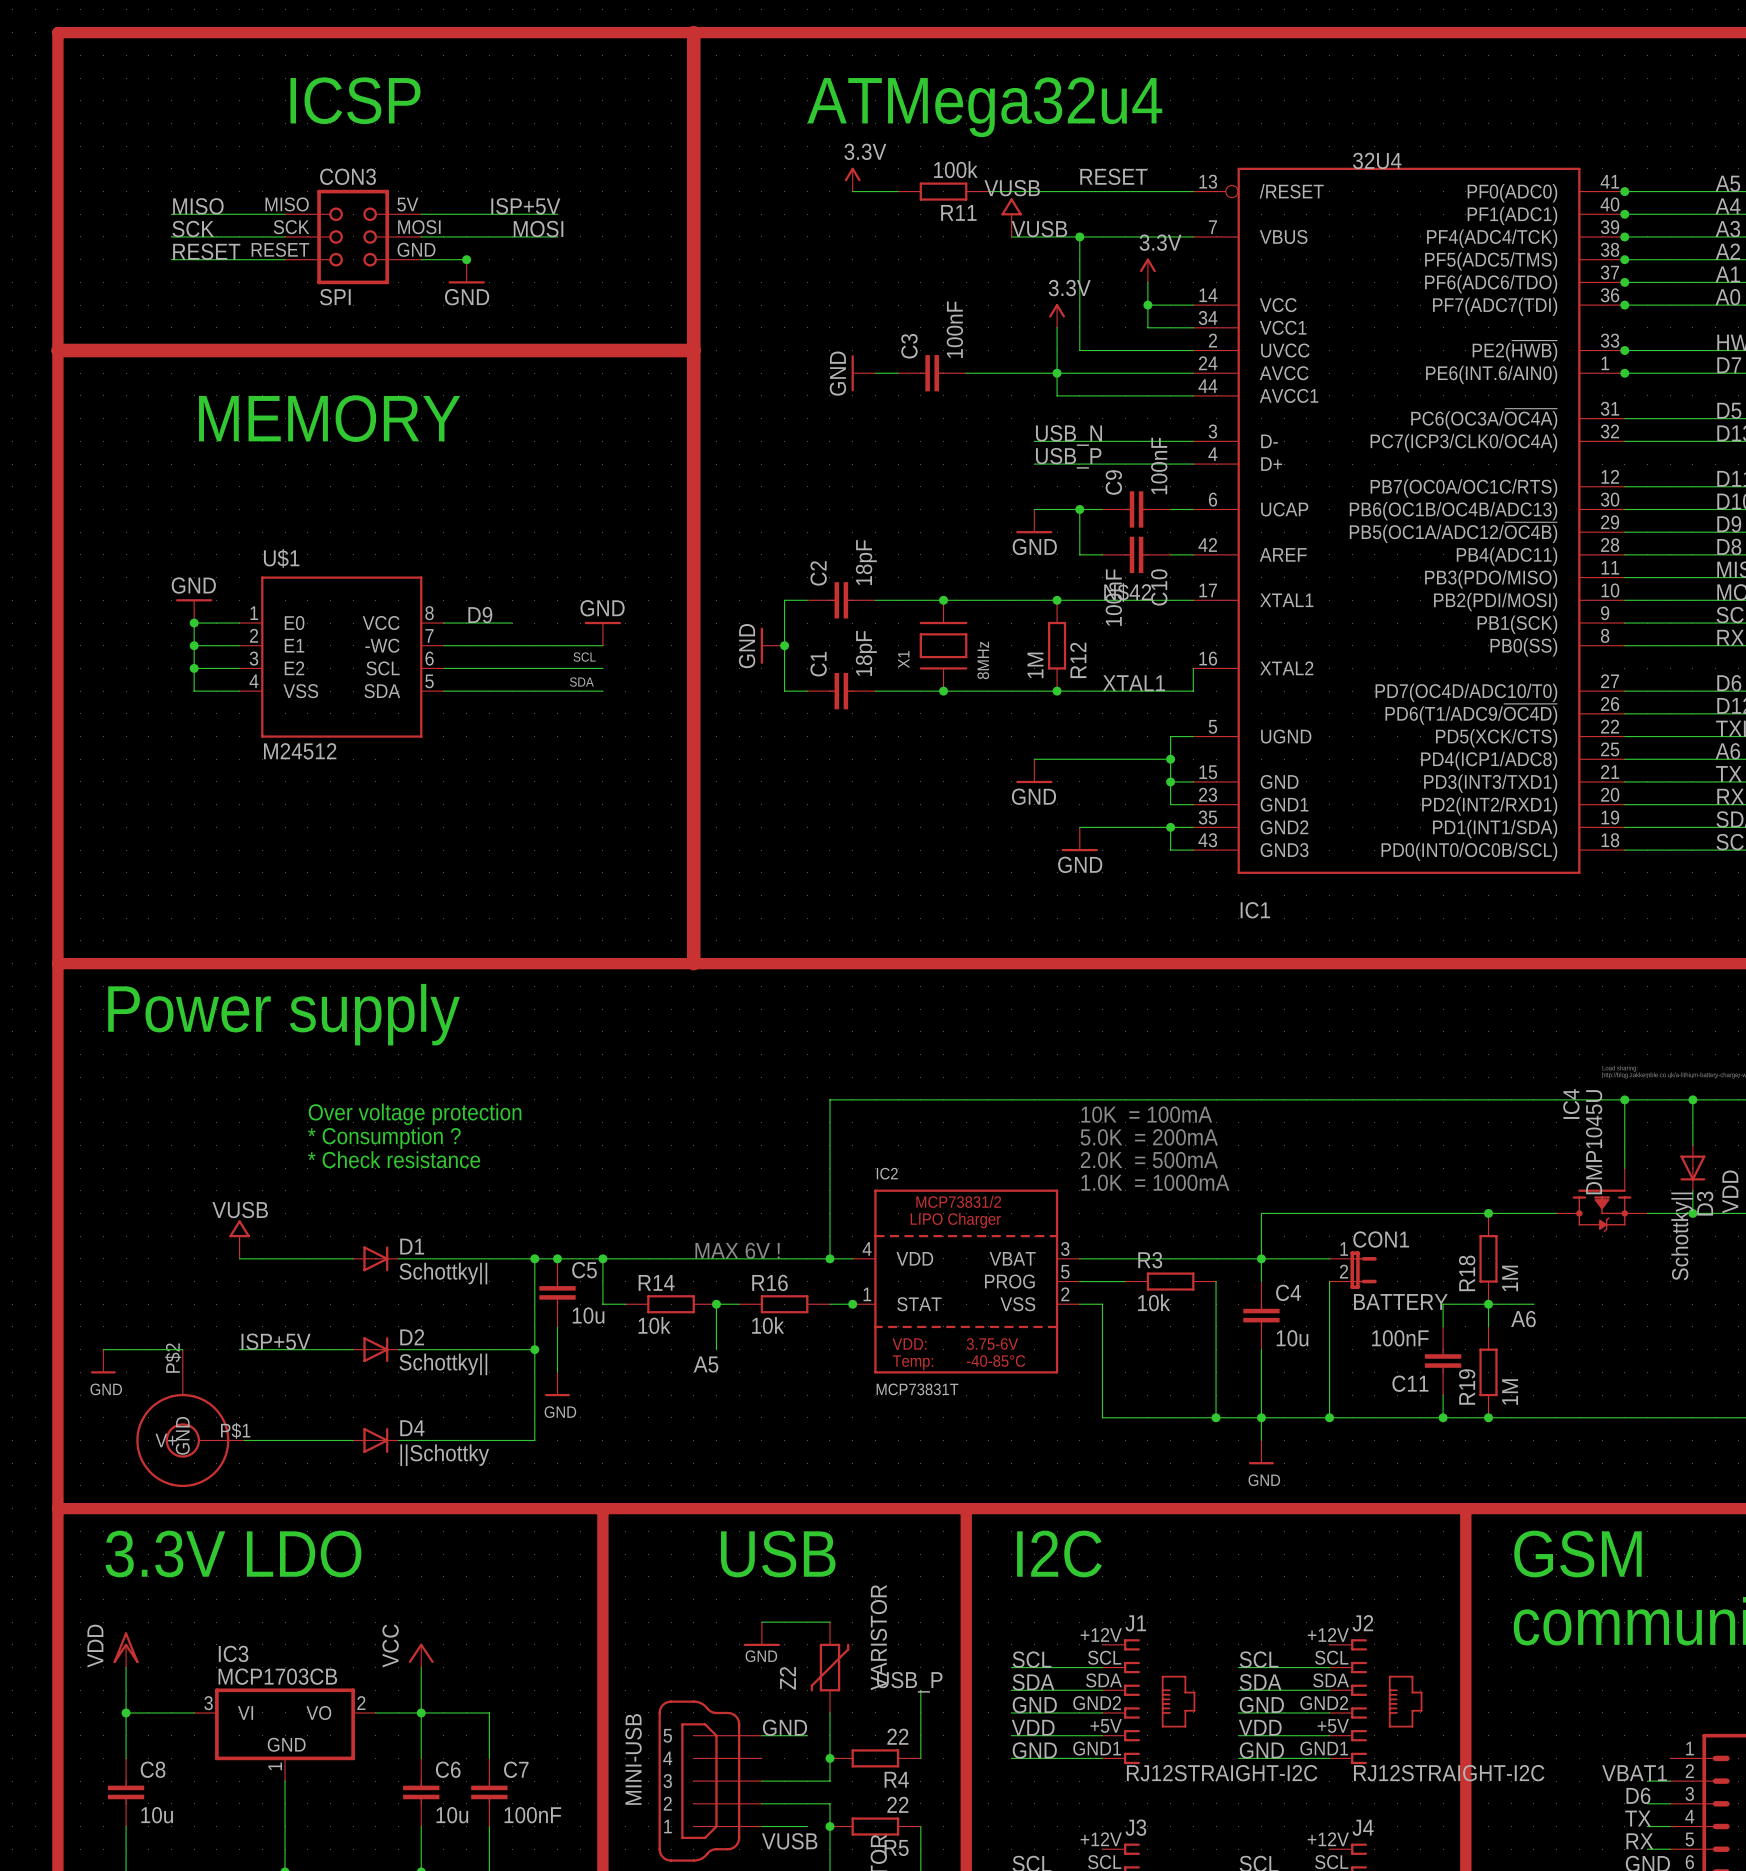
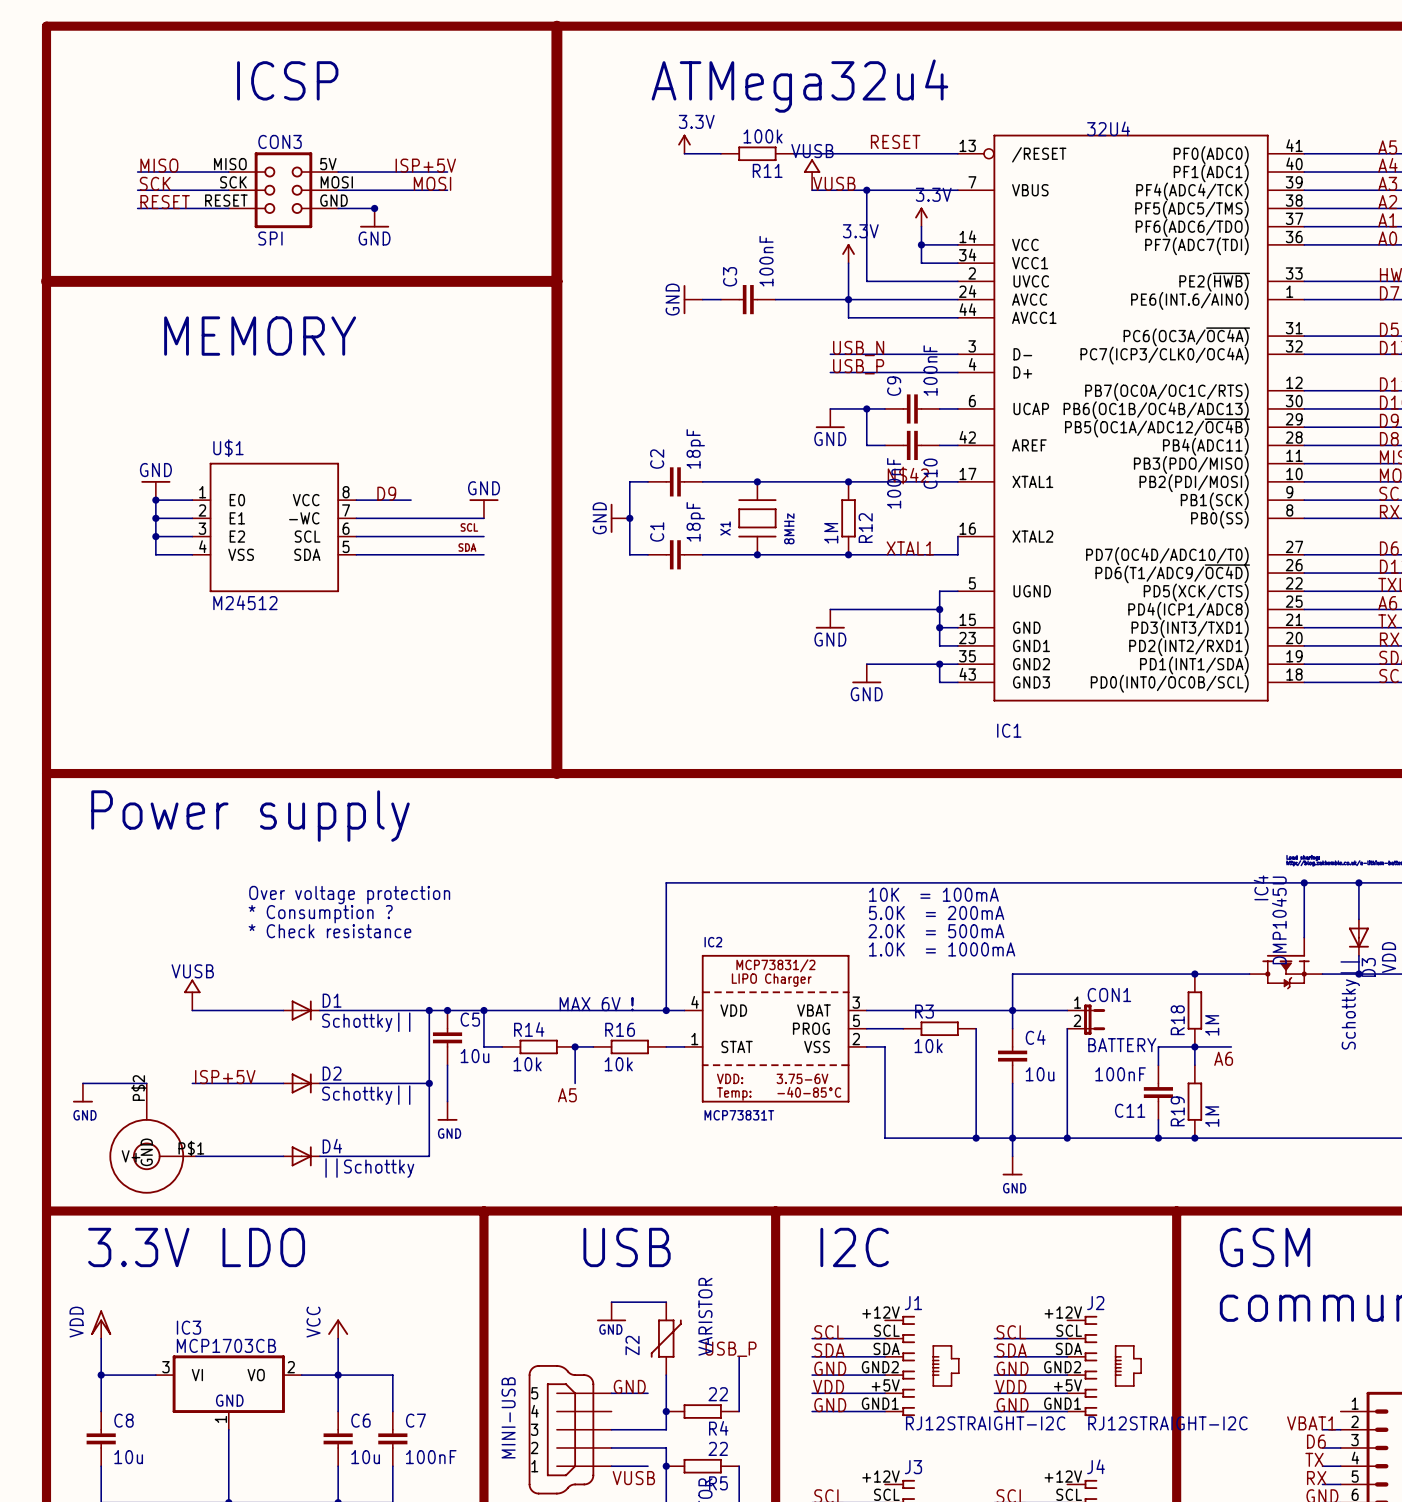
junction: (1624, 191) -> none
junction: (1624, 214) -> none
junction: (1624, 236) -> none
junction: (1624, 259) -> none
junction: (1624, 282) -> none
junction: (1624, 305) -> none
junction: (1624, 350) -> none
junction: (1624, 373) -> none
junction: (852, 1304) -> none

